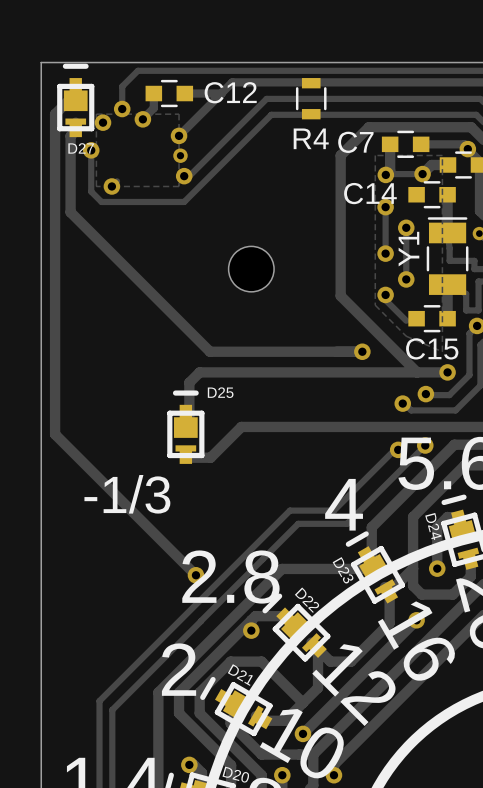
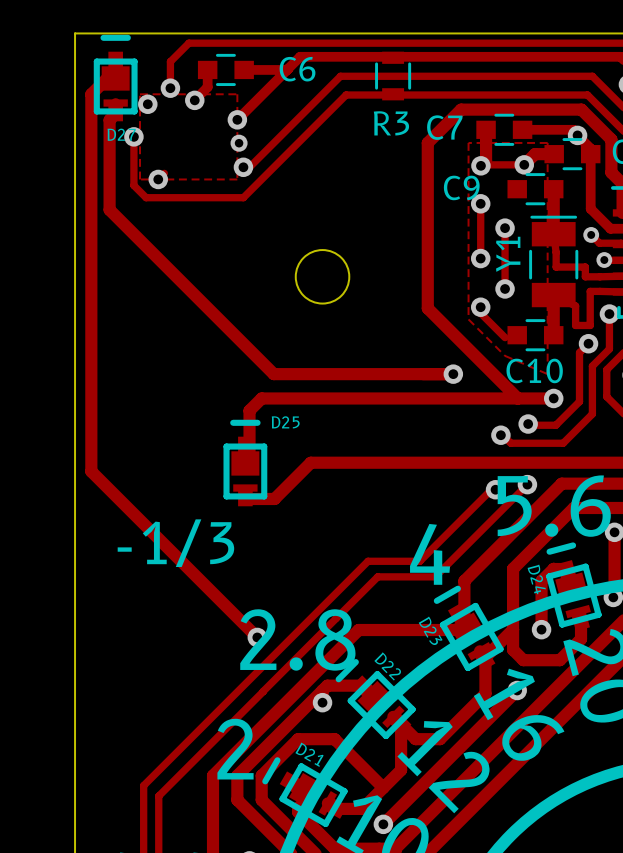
C12 name: C12 (230, 92) -> C6 (297, 69)
R4 name: R4 (311, 138) -> R3 (391, 123)
C14 name: C14 (370, 193) -> C9 (461, 187)
C15 name: C15 (432, 348) -> C10 (534, 370)

